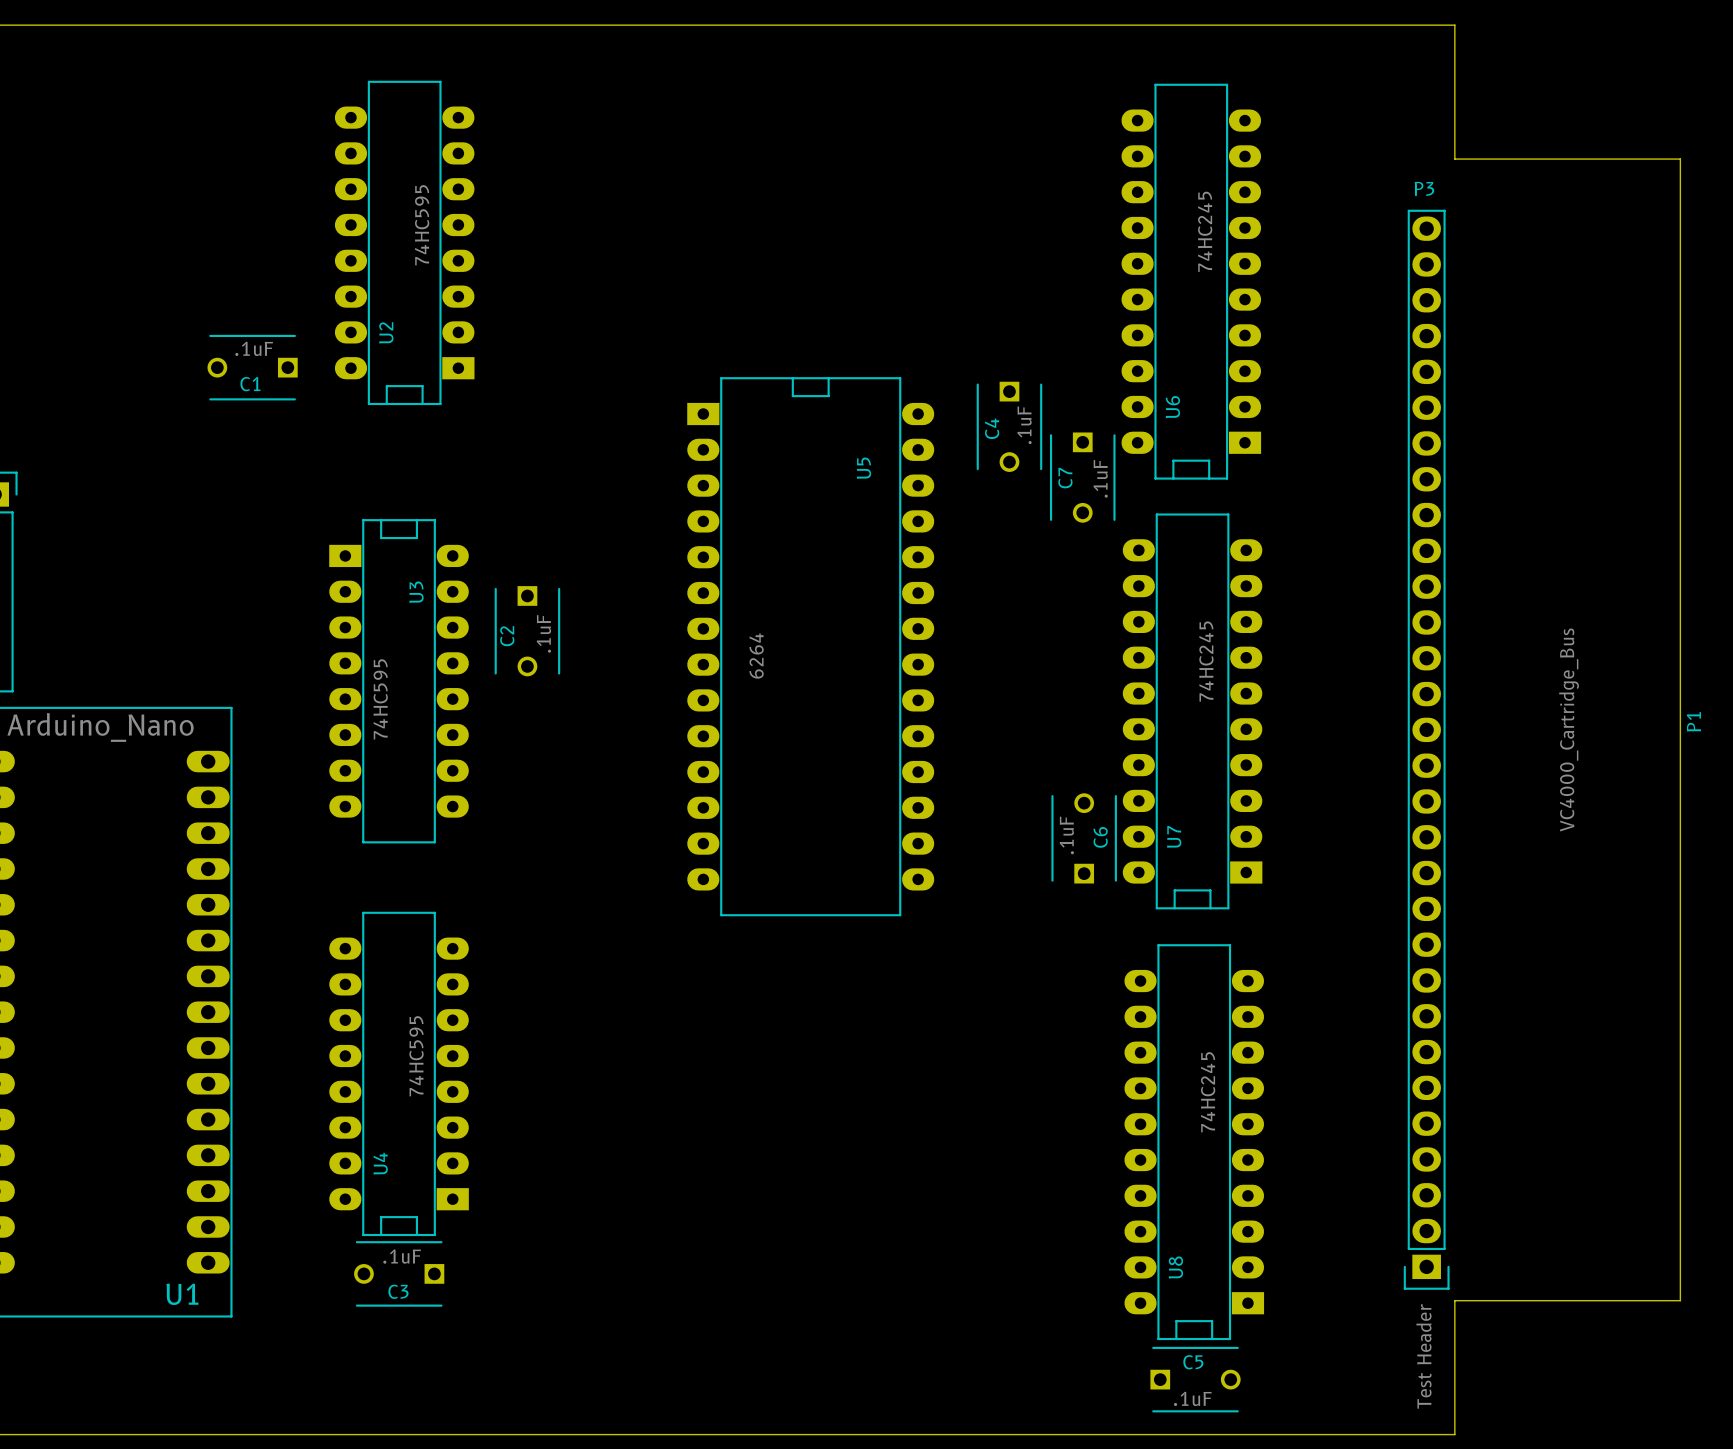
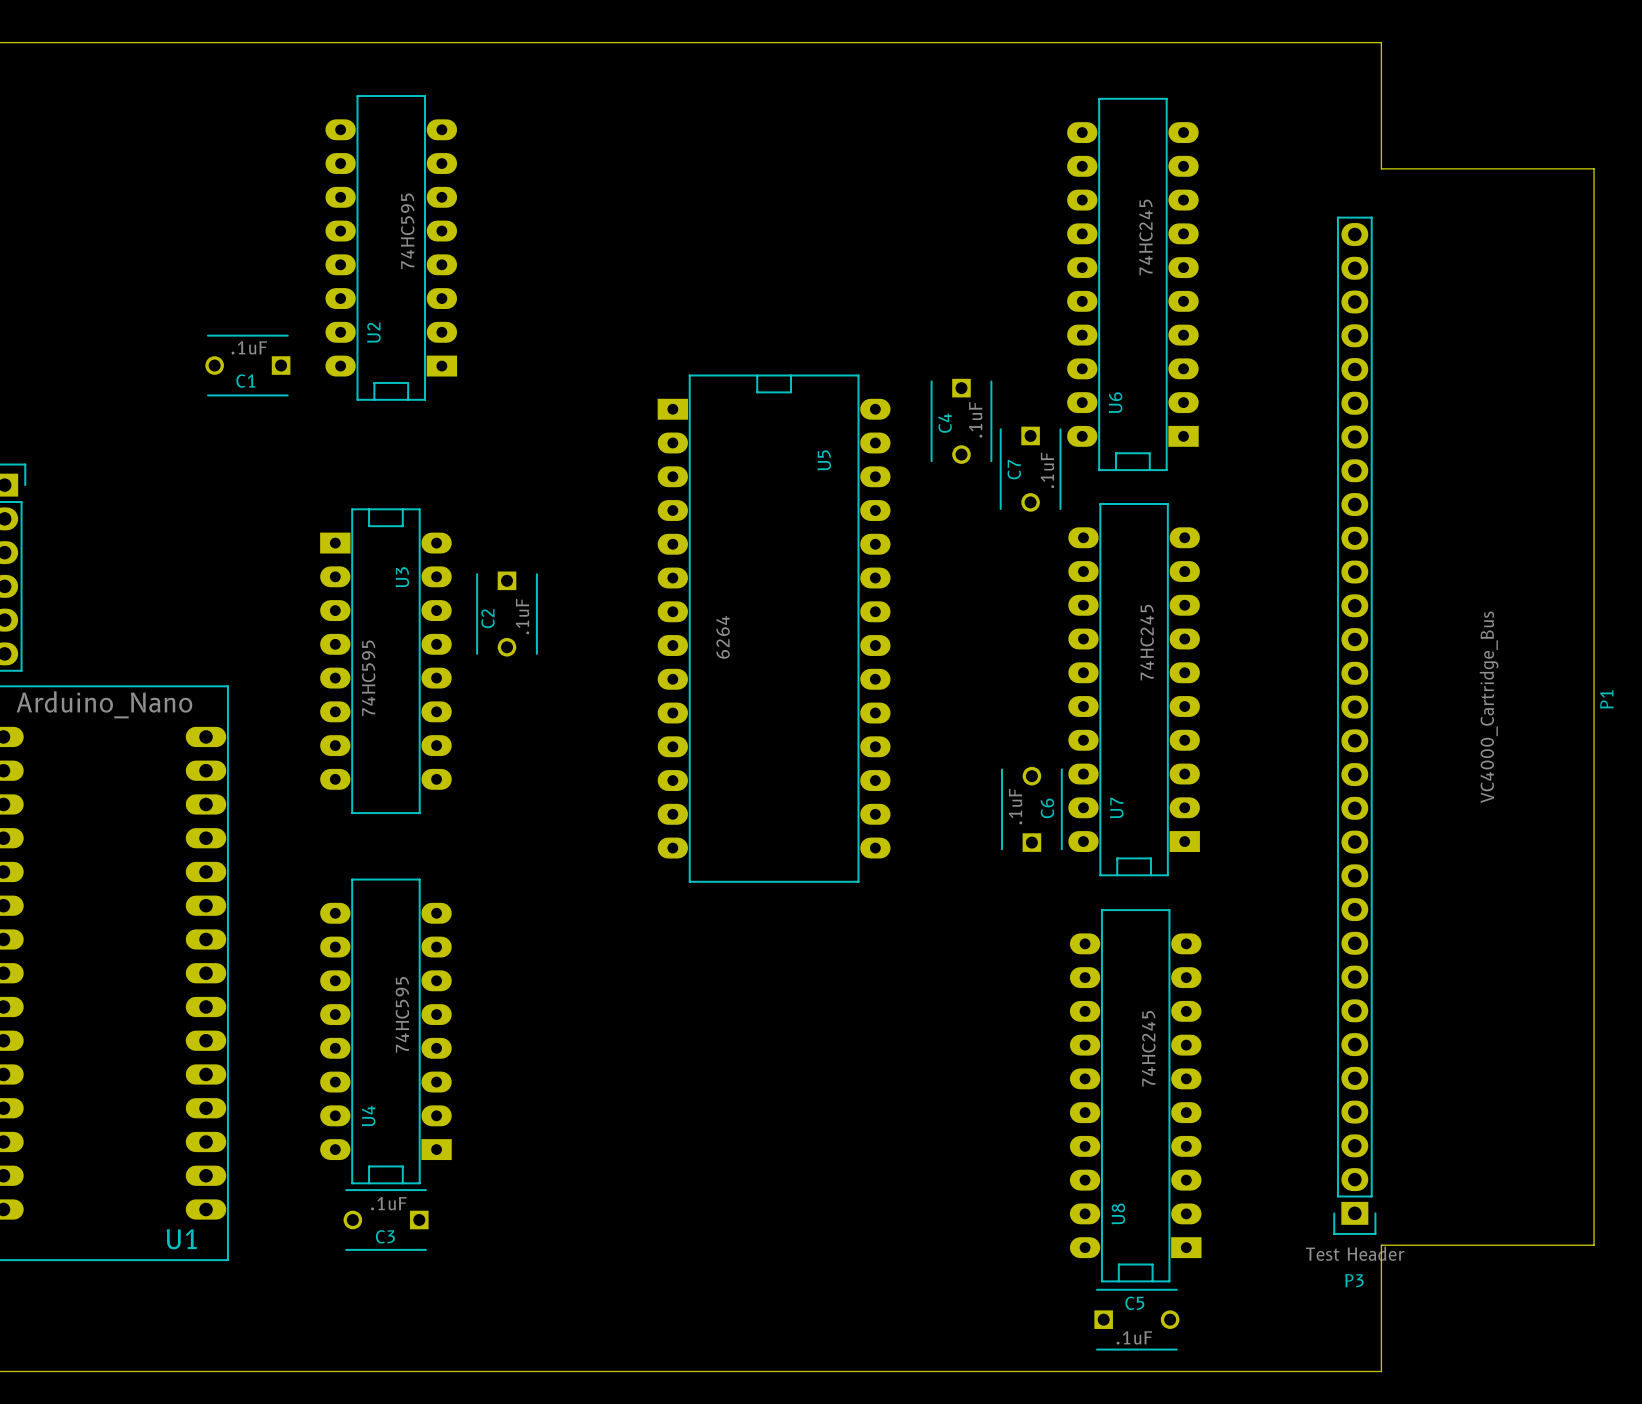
P3 name position: P3 (1424, 188) -> P3 (1354, 1280)
P3 value rotation: 0° (1423, 1356) -> 90° clockwise (1355, 1253)

